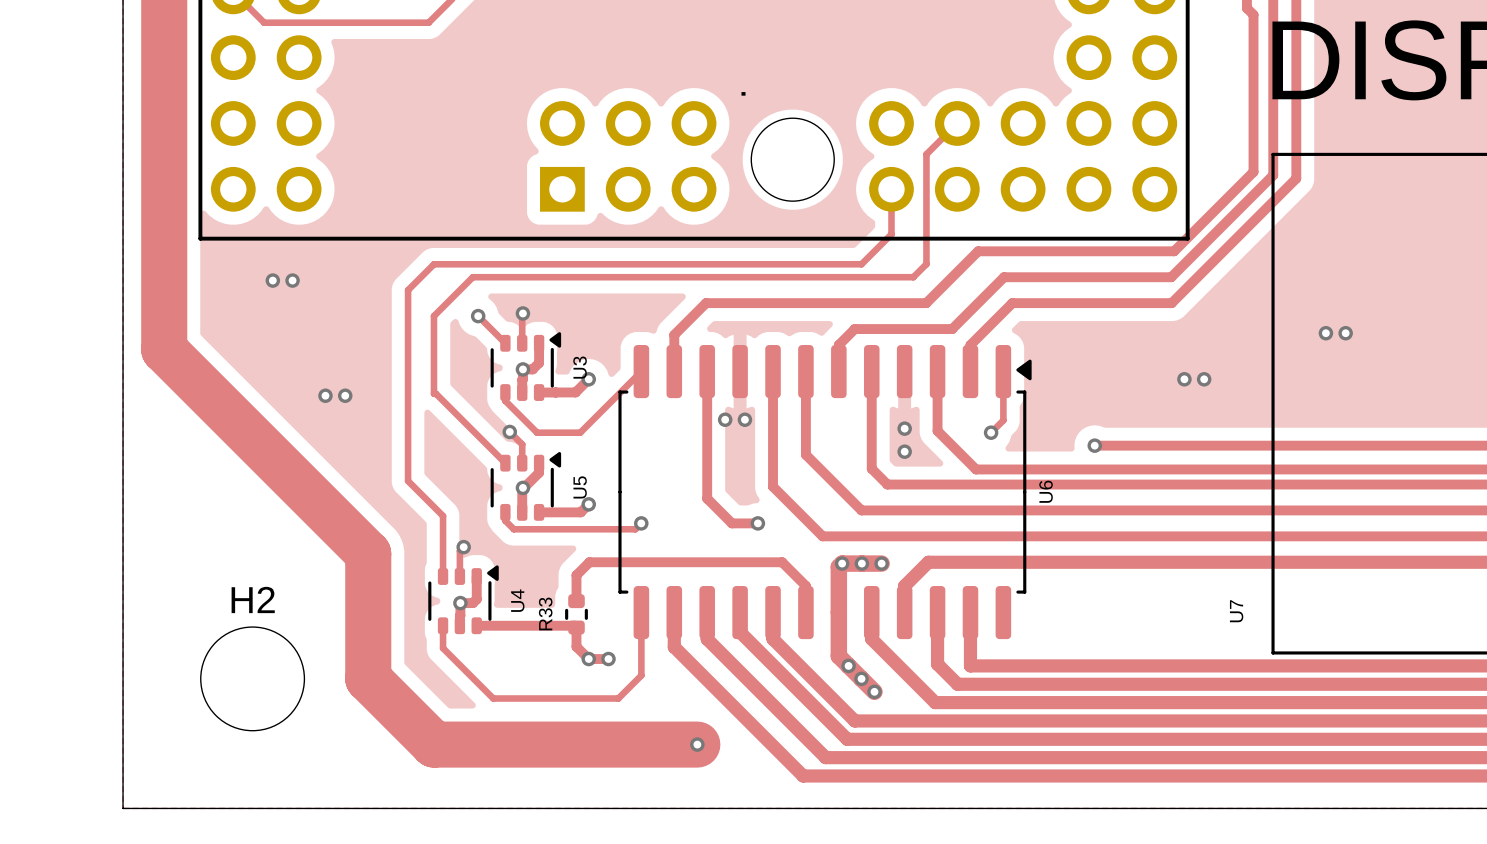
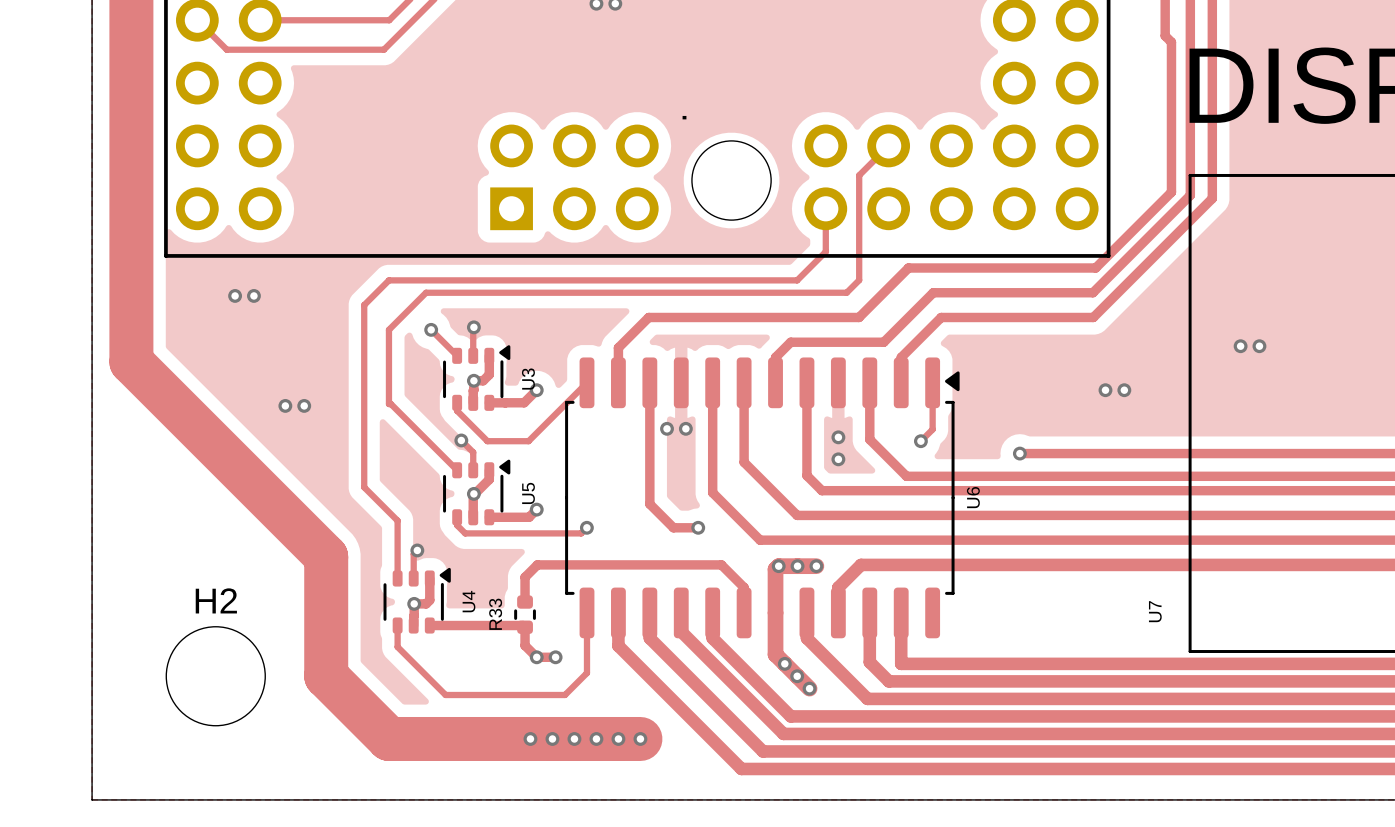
via: none -> (530, 738)
via: none -> (552, 738)
via: none -> (574, 738)
via: none -> (596, 738)
via: none -> (618, 738)

